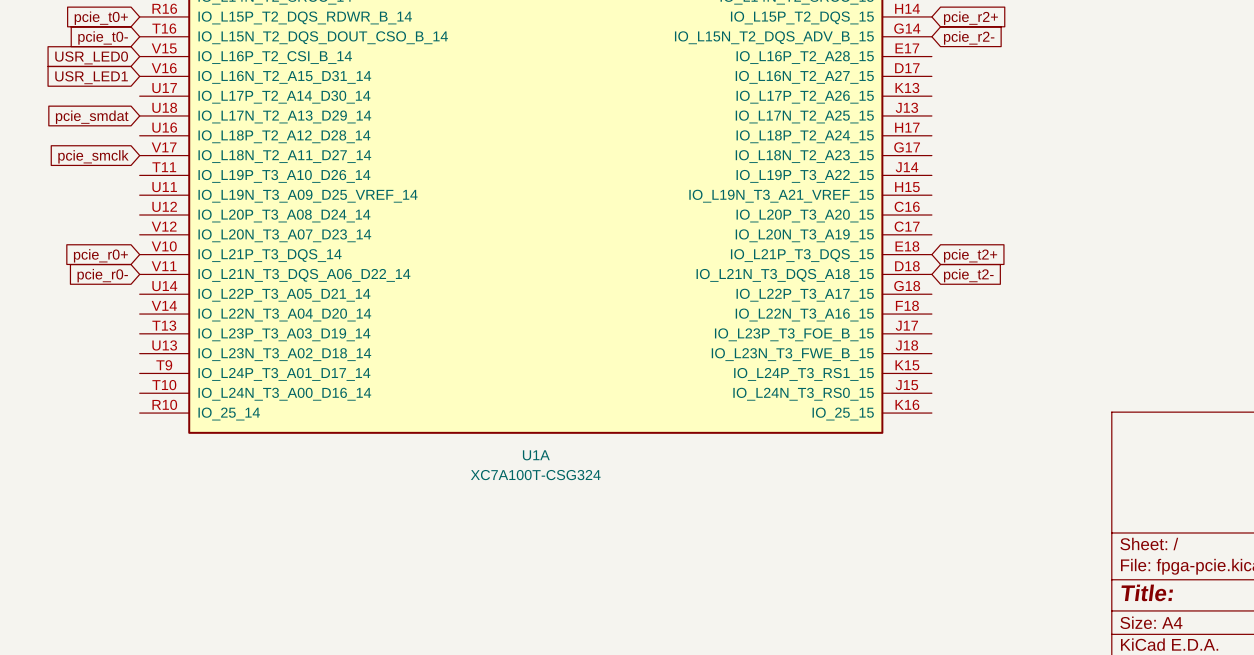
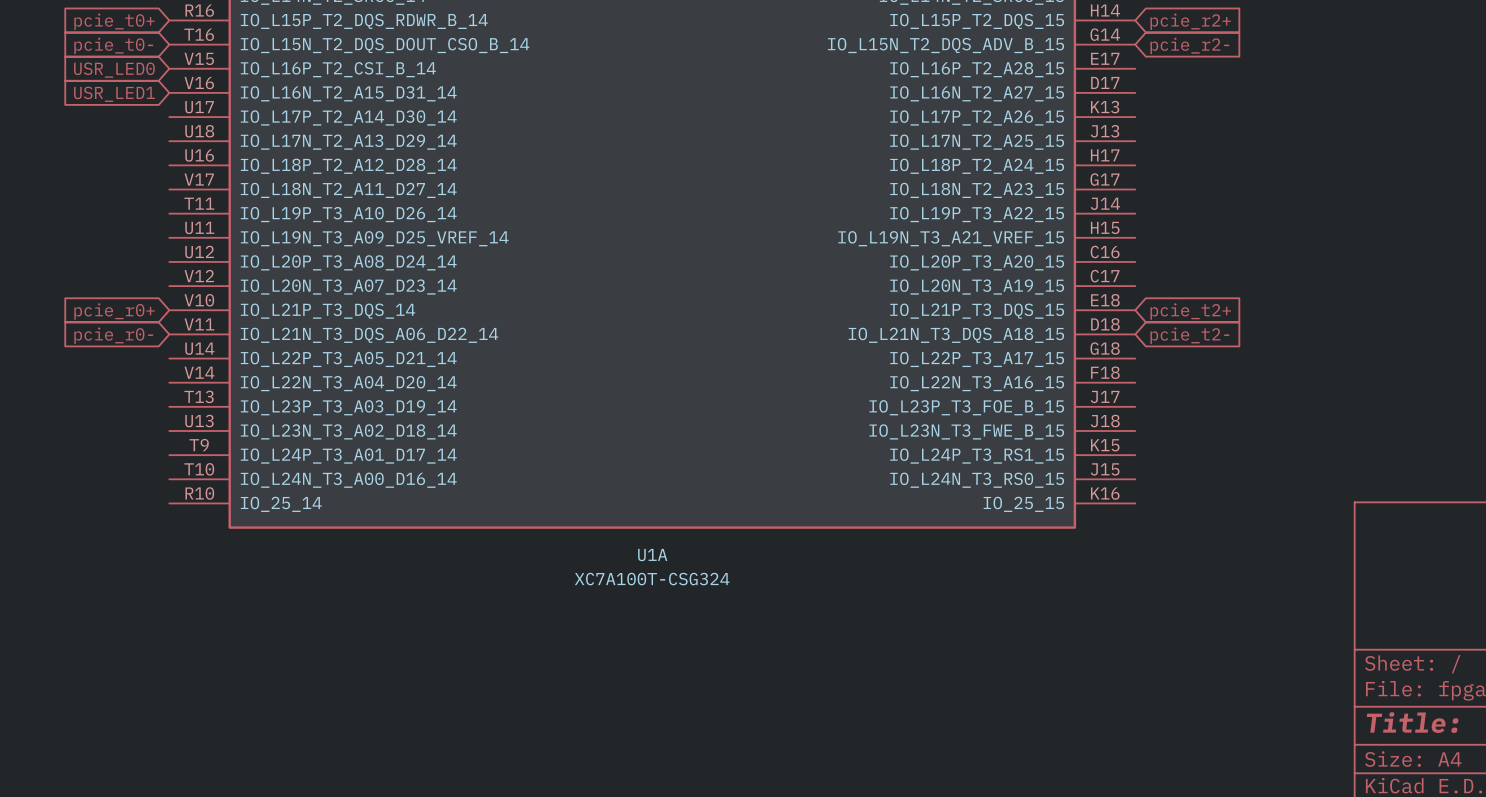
global label: pcie_smdat (92, 117) -> none
global label: pcie_smclk (93, 156) -> none

